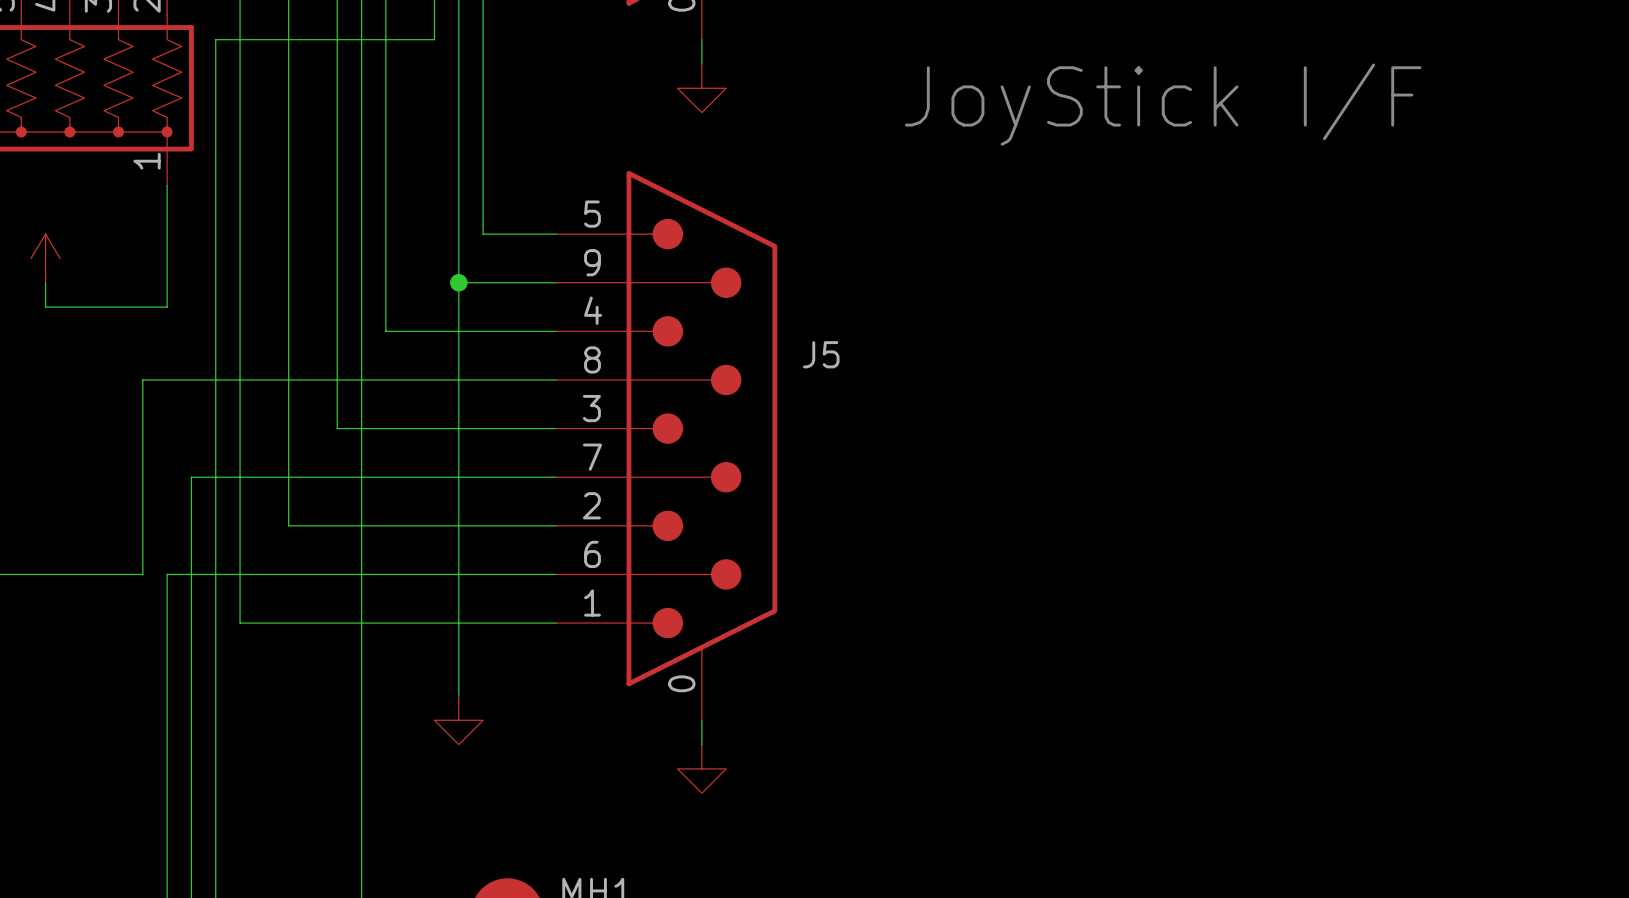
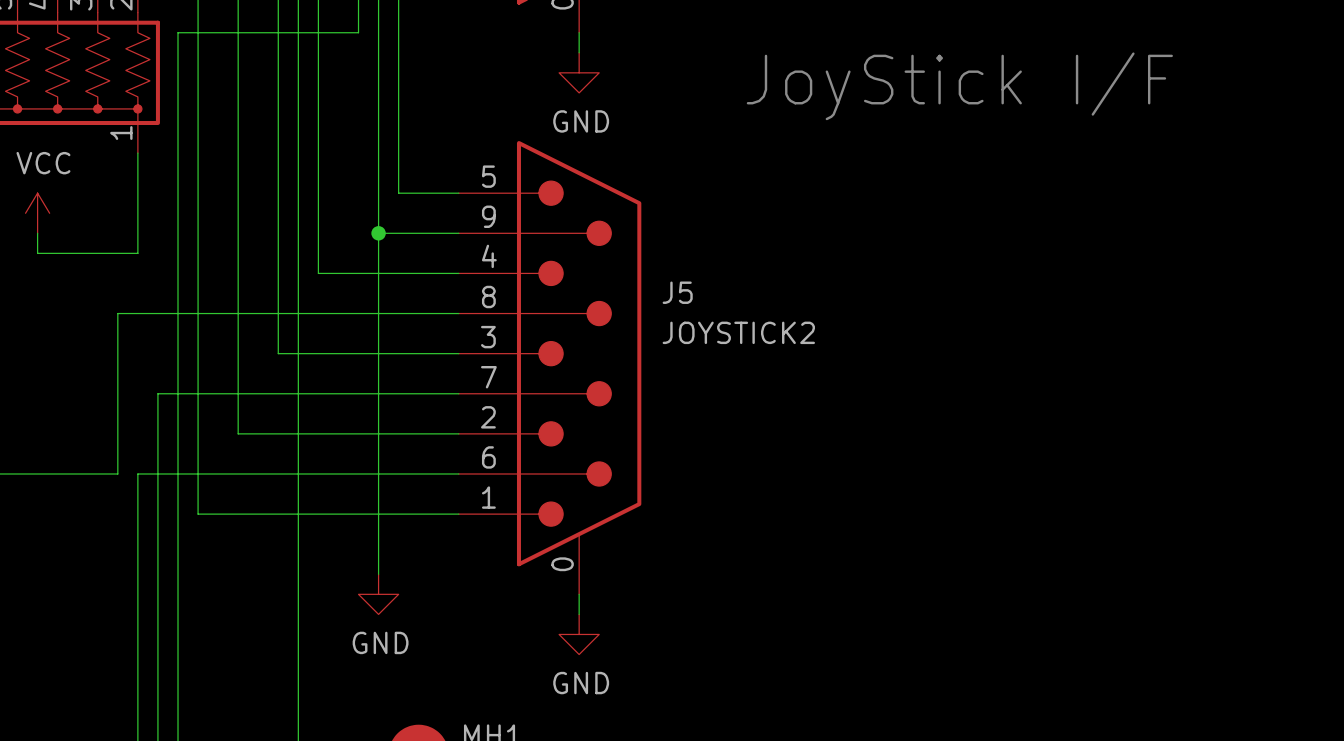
power symbol text: none -> GND (581, 121)
power symbol text: none -> VCC (43, 163)
J5 value: none -> JOYSTICK2 (738, 332)
power symbol text: none -> GND (380, 642)
power symbol text: none -> GND (581, 683)

